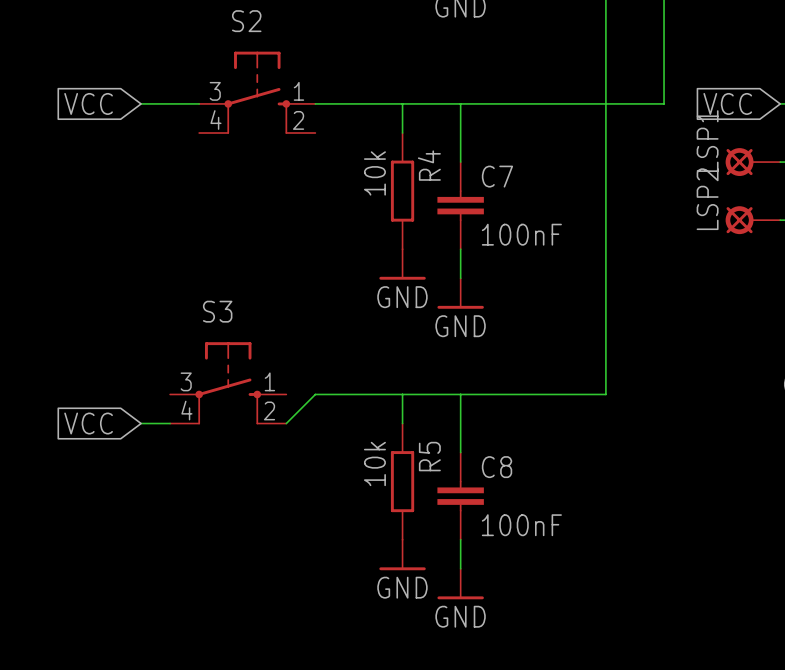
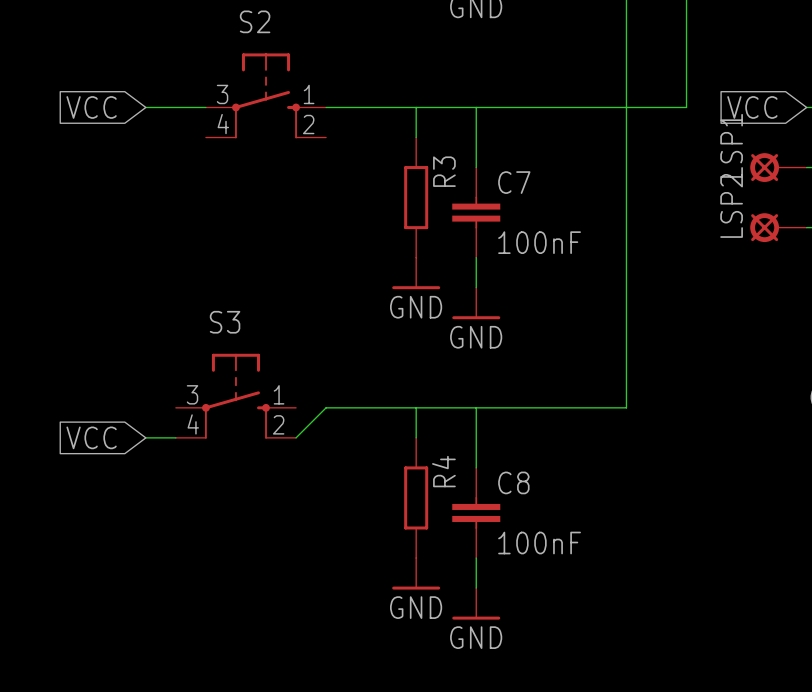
R4 name: R4 (429, 165) -> R3 (444, 171)
R4 value: 10k (374, 173) -> none
R5 name: R5 (429, 456) -> R4 (443, 471)
R5 value: 10k (374, 463) -> none

